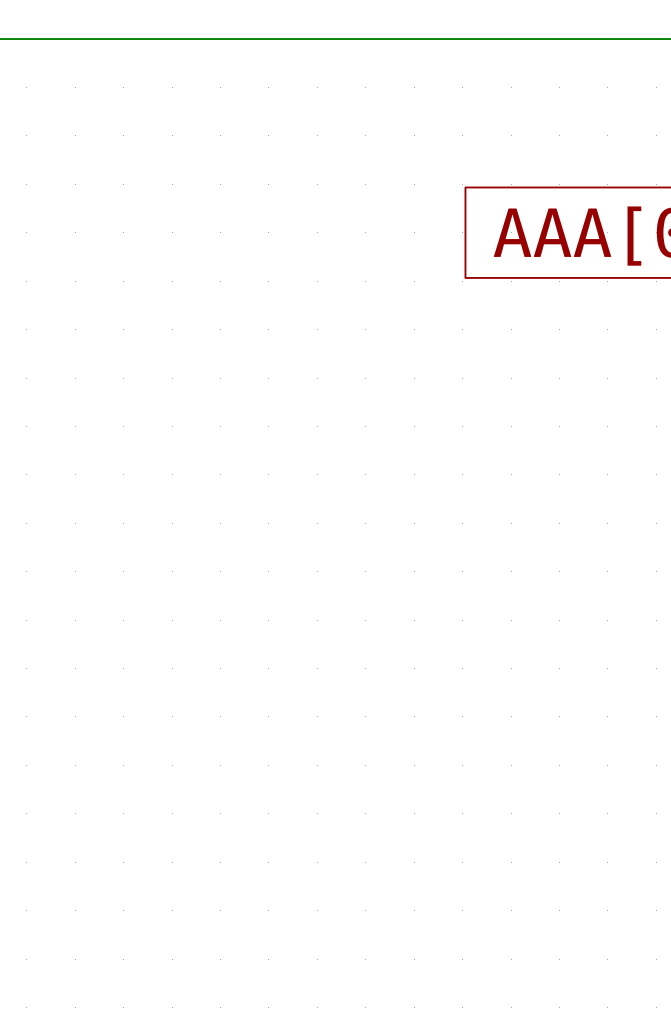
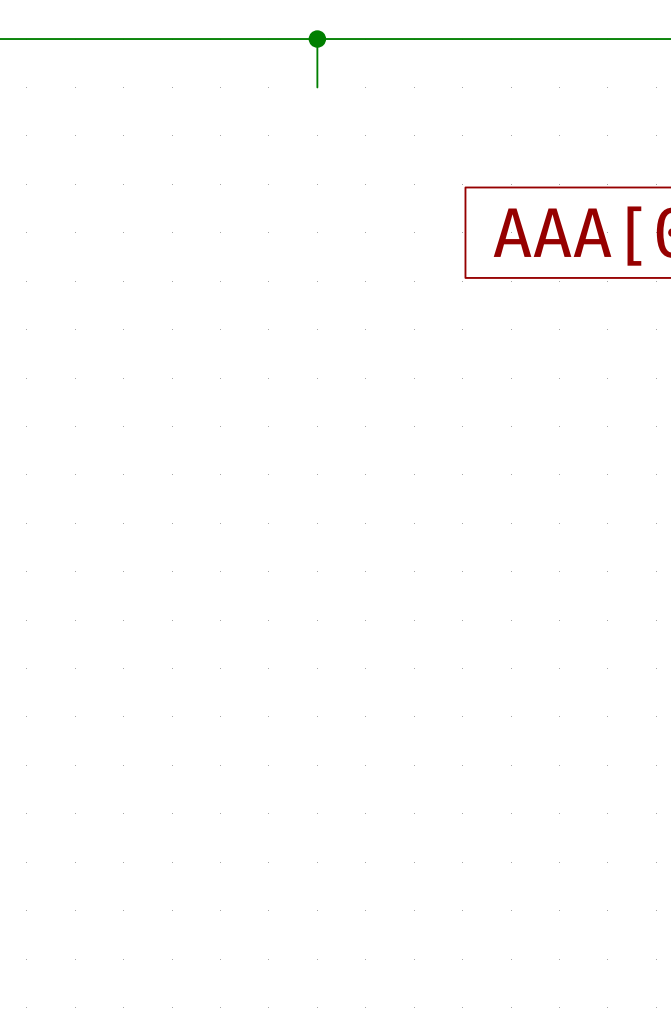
wire: none -> (317, 39) (317, 87)
junction: none -> (317, 39)

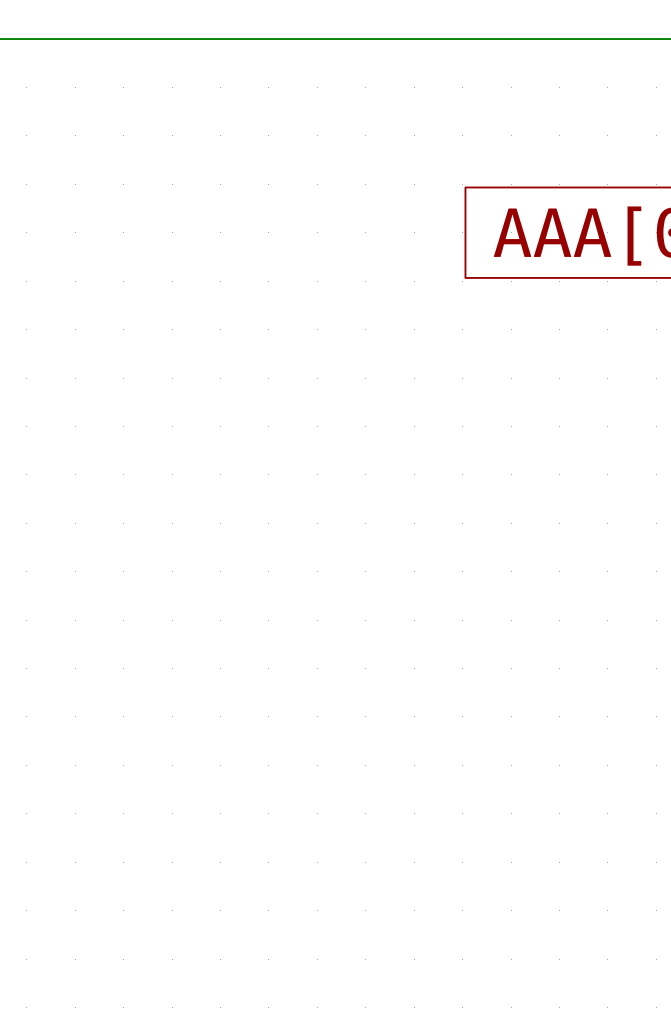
wire: (317, 39) (317, 87) -> none
junction: (317, 39) -> none

